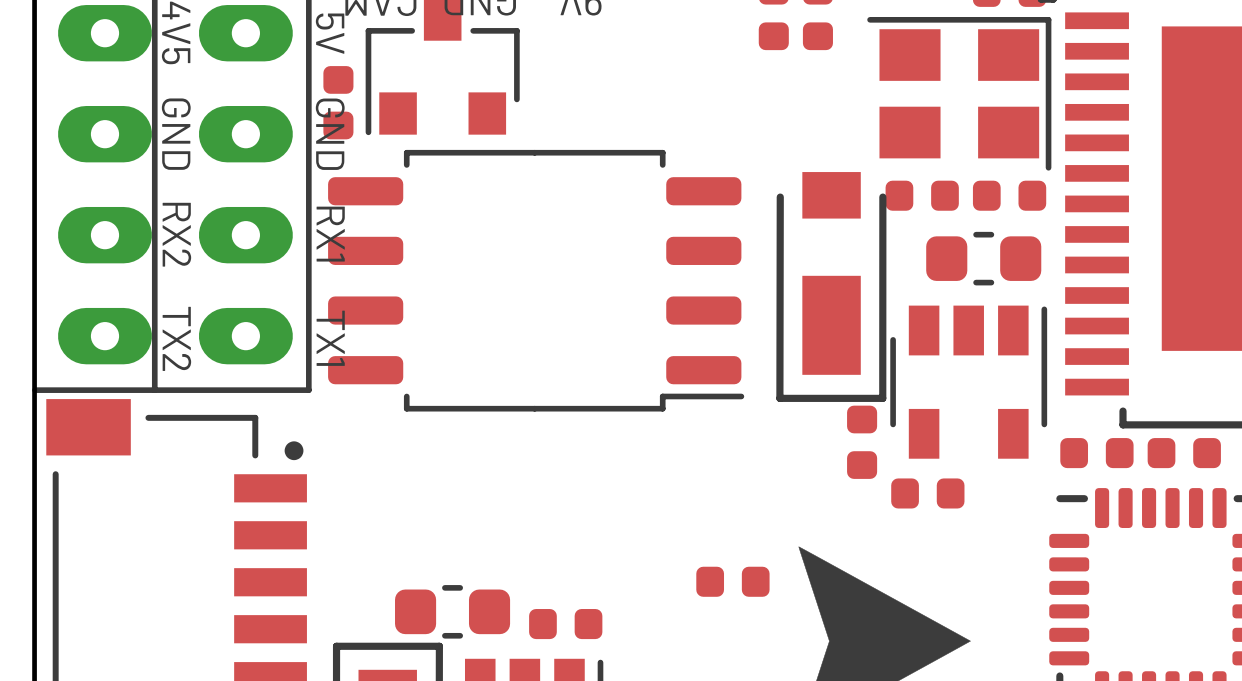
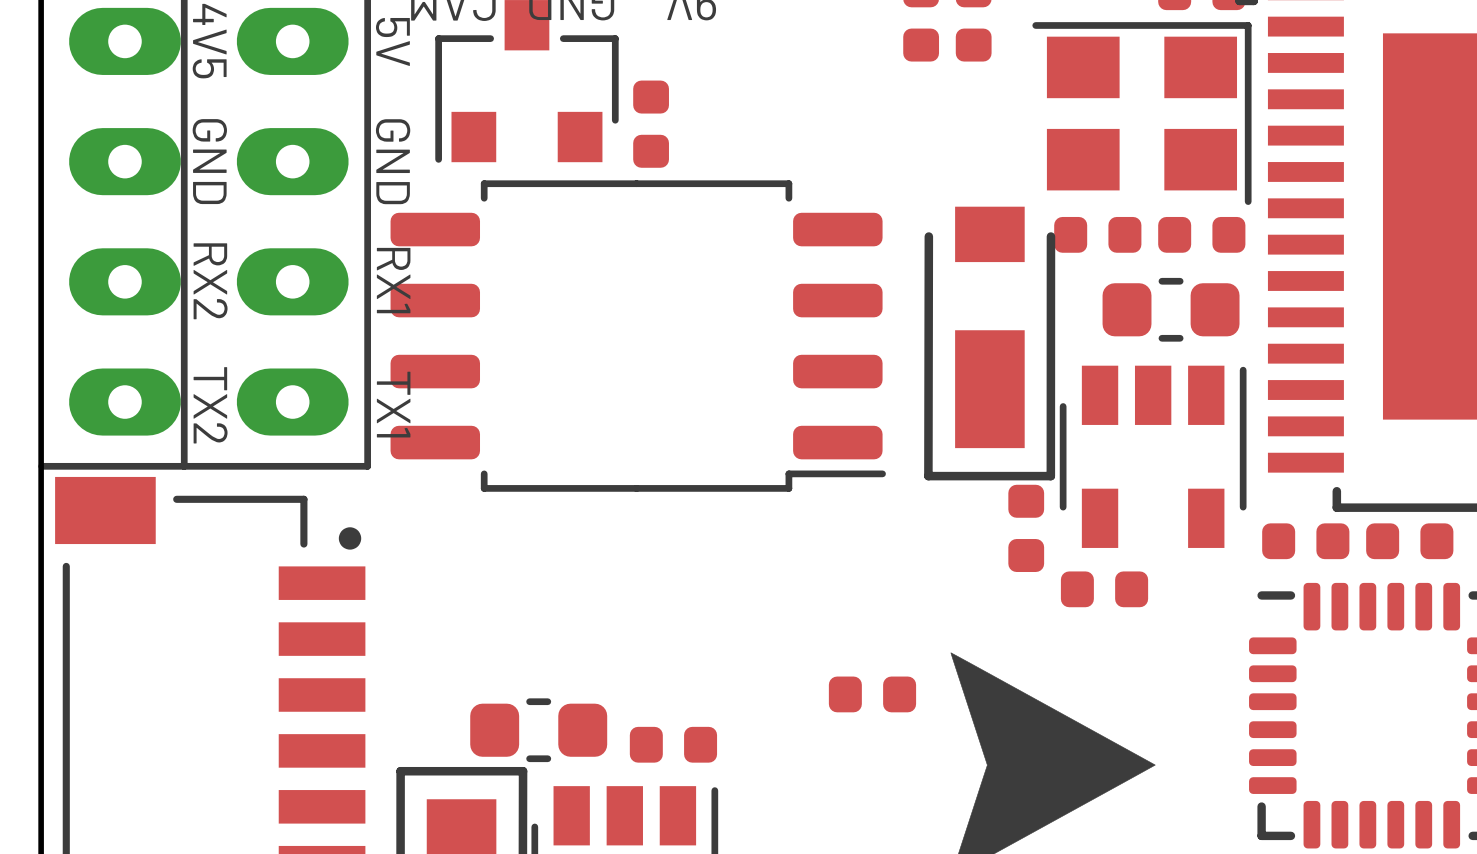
part position: (338, 102) -> (651, 124)

